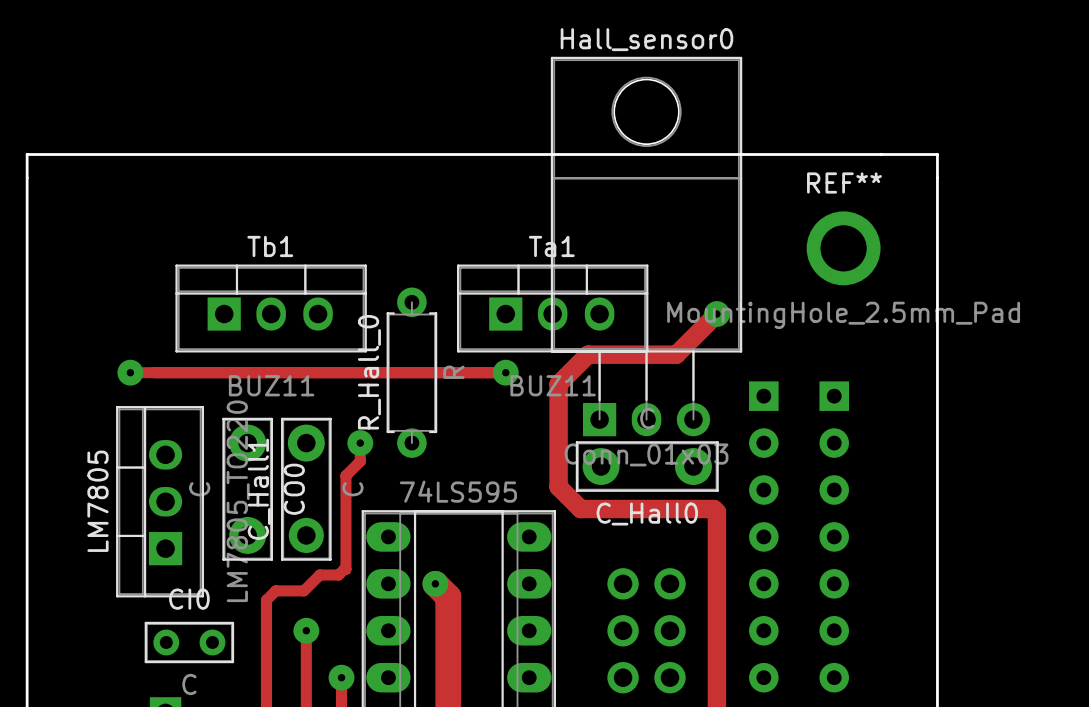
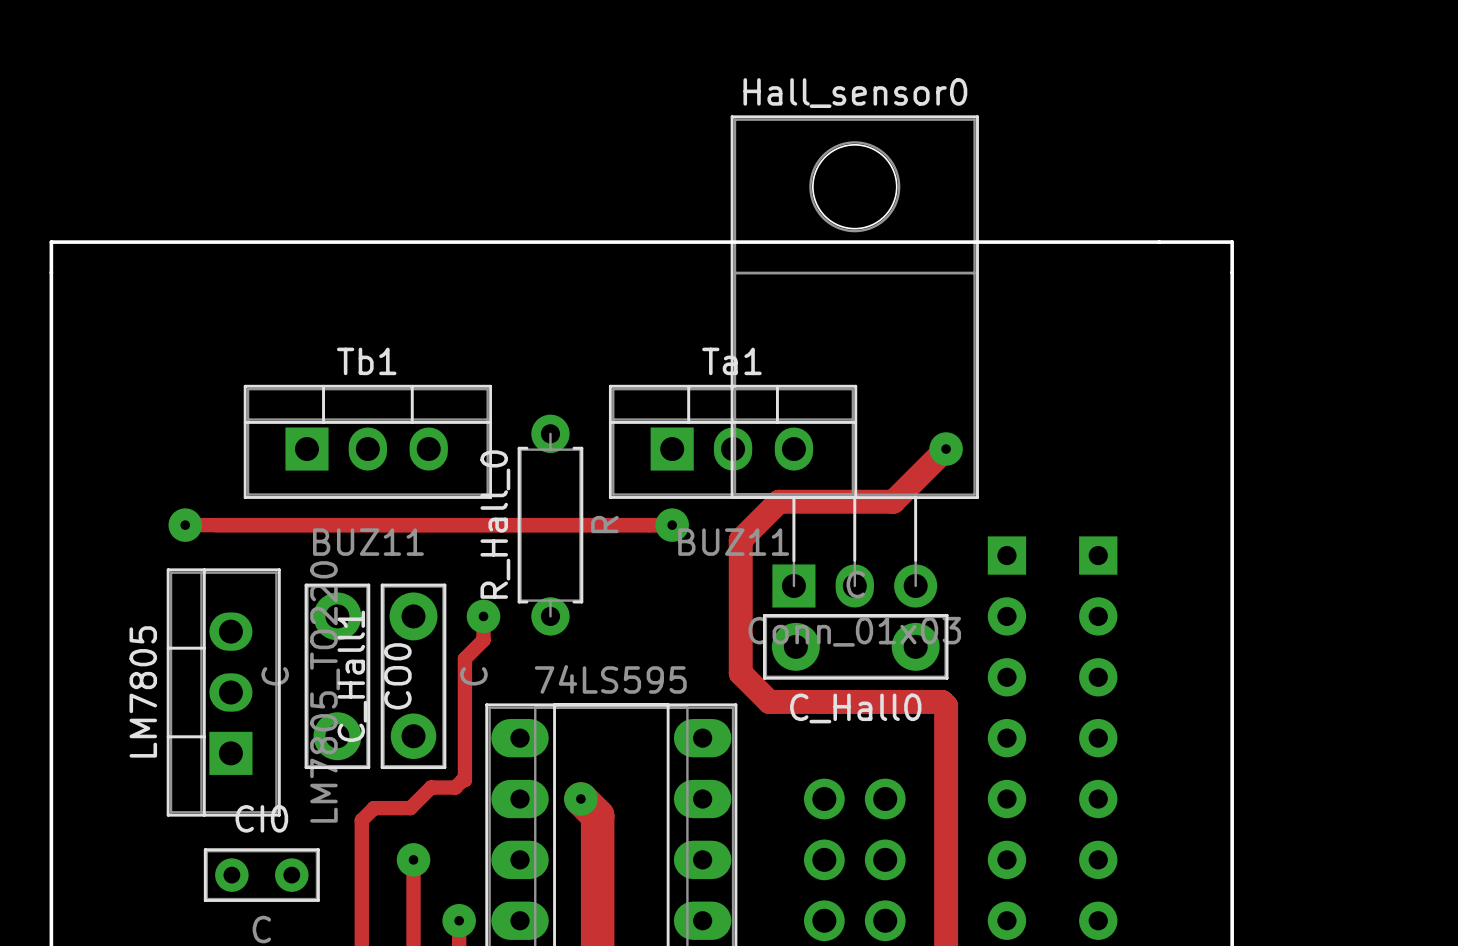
REF**: MountingHole_2.5mm_Pad (843, 248) -> none

